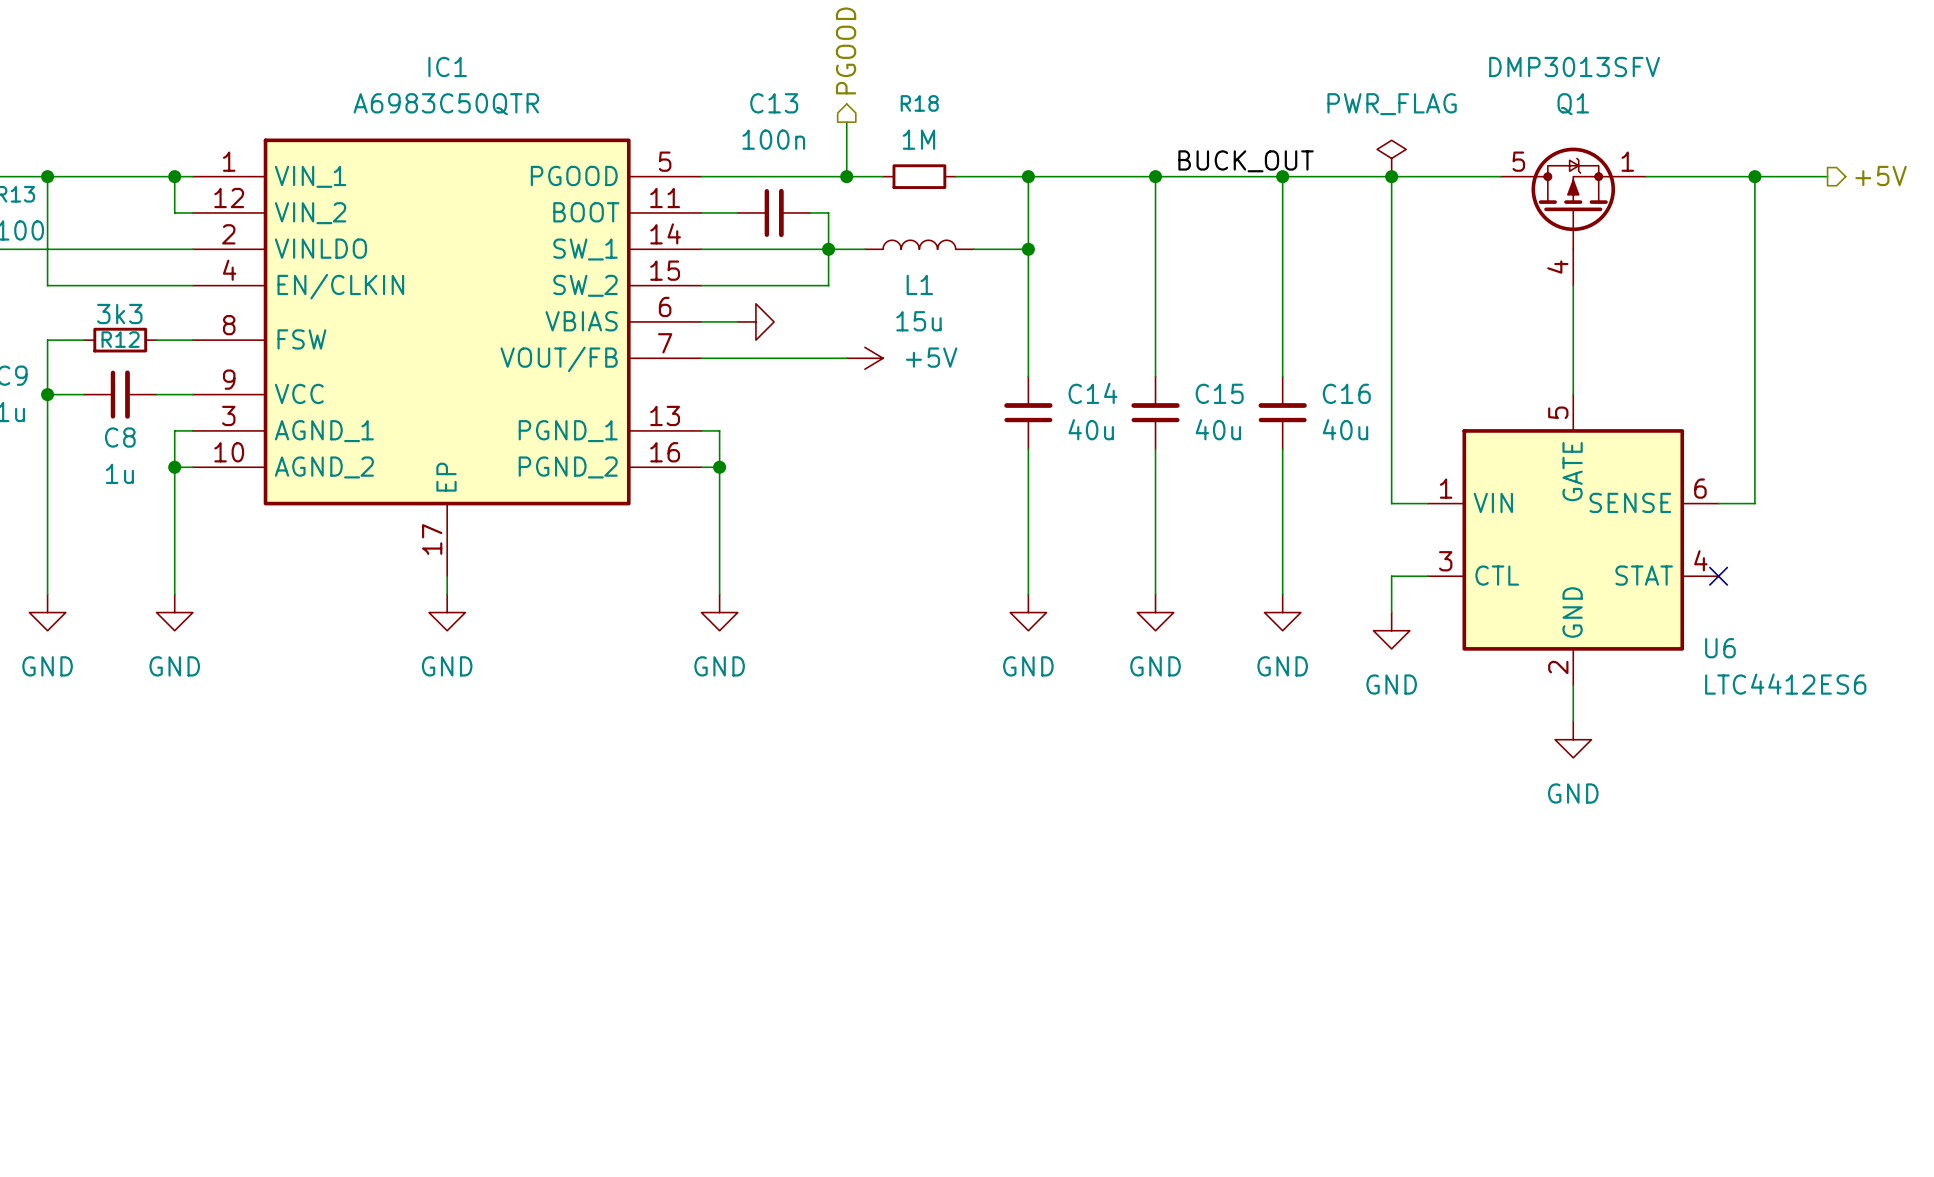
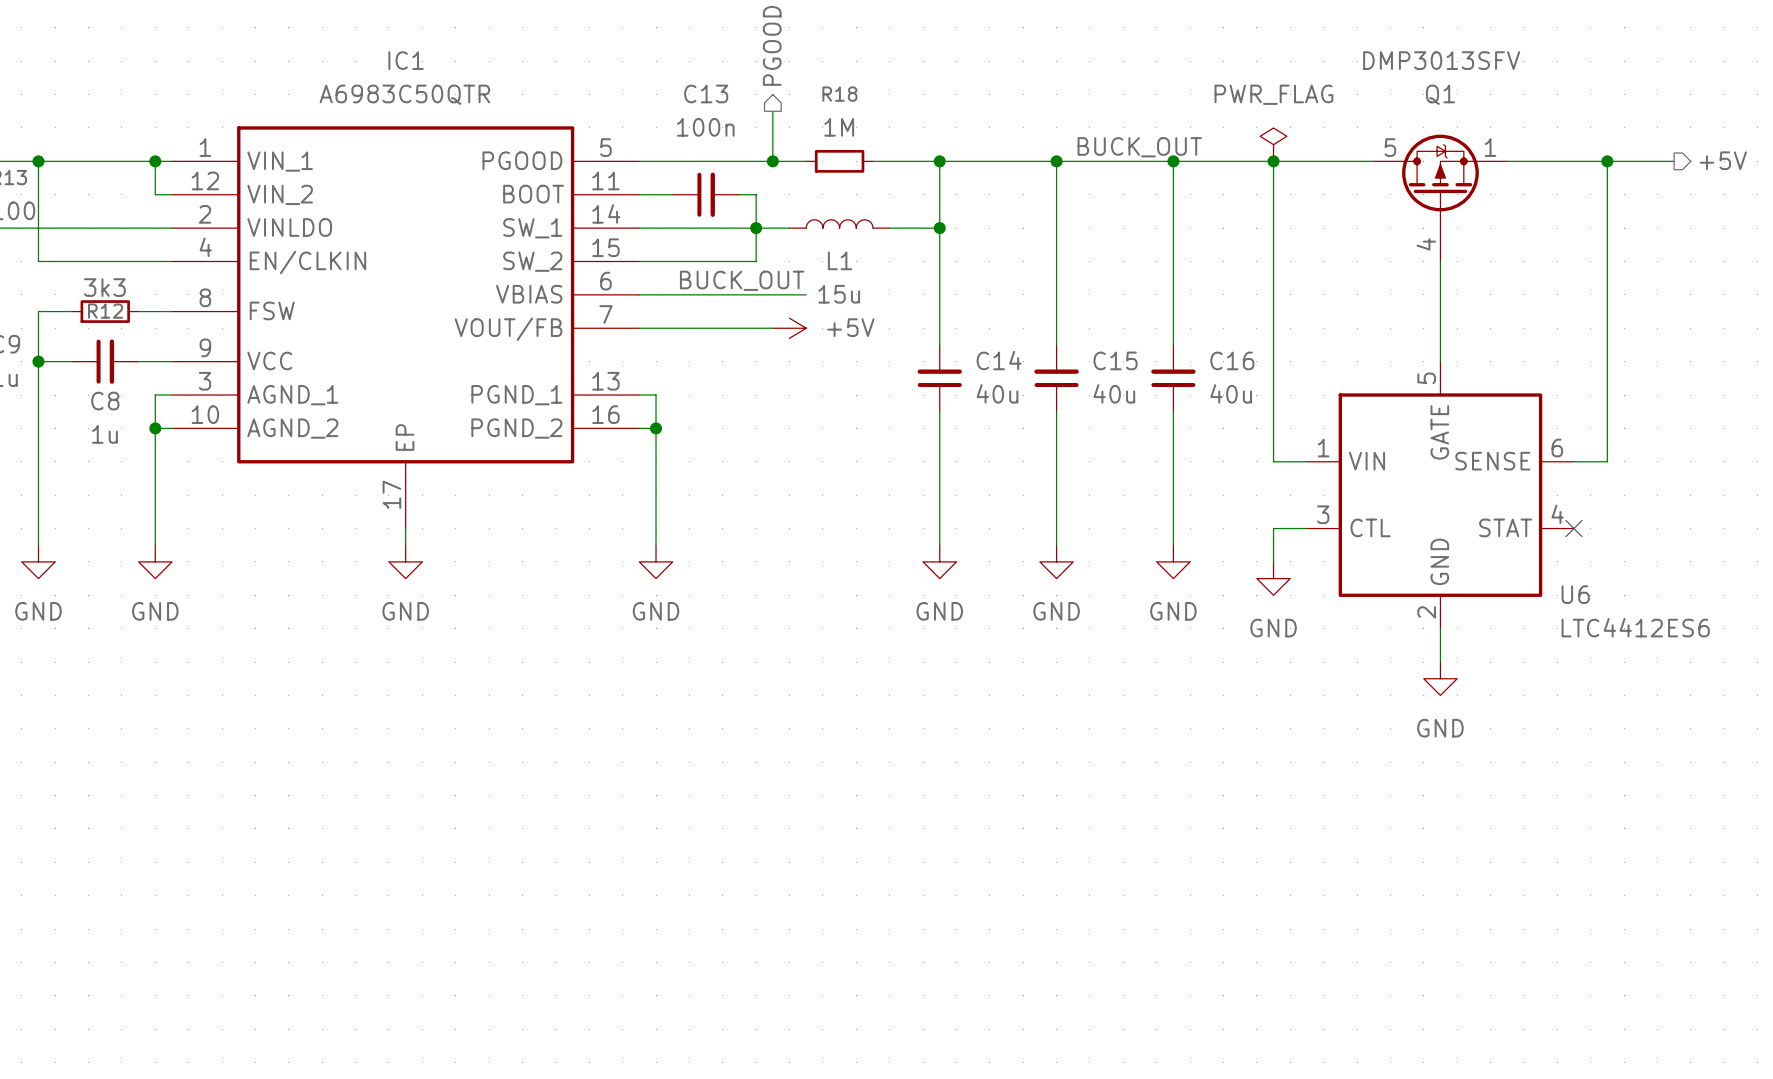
label: none -> BUCK_OUT (742, 280)
wire: none -> (672, 294) (806, 294)
power symbol: (755, 321) -> none

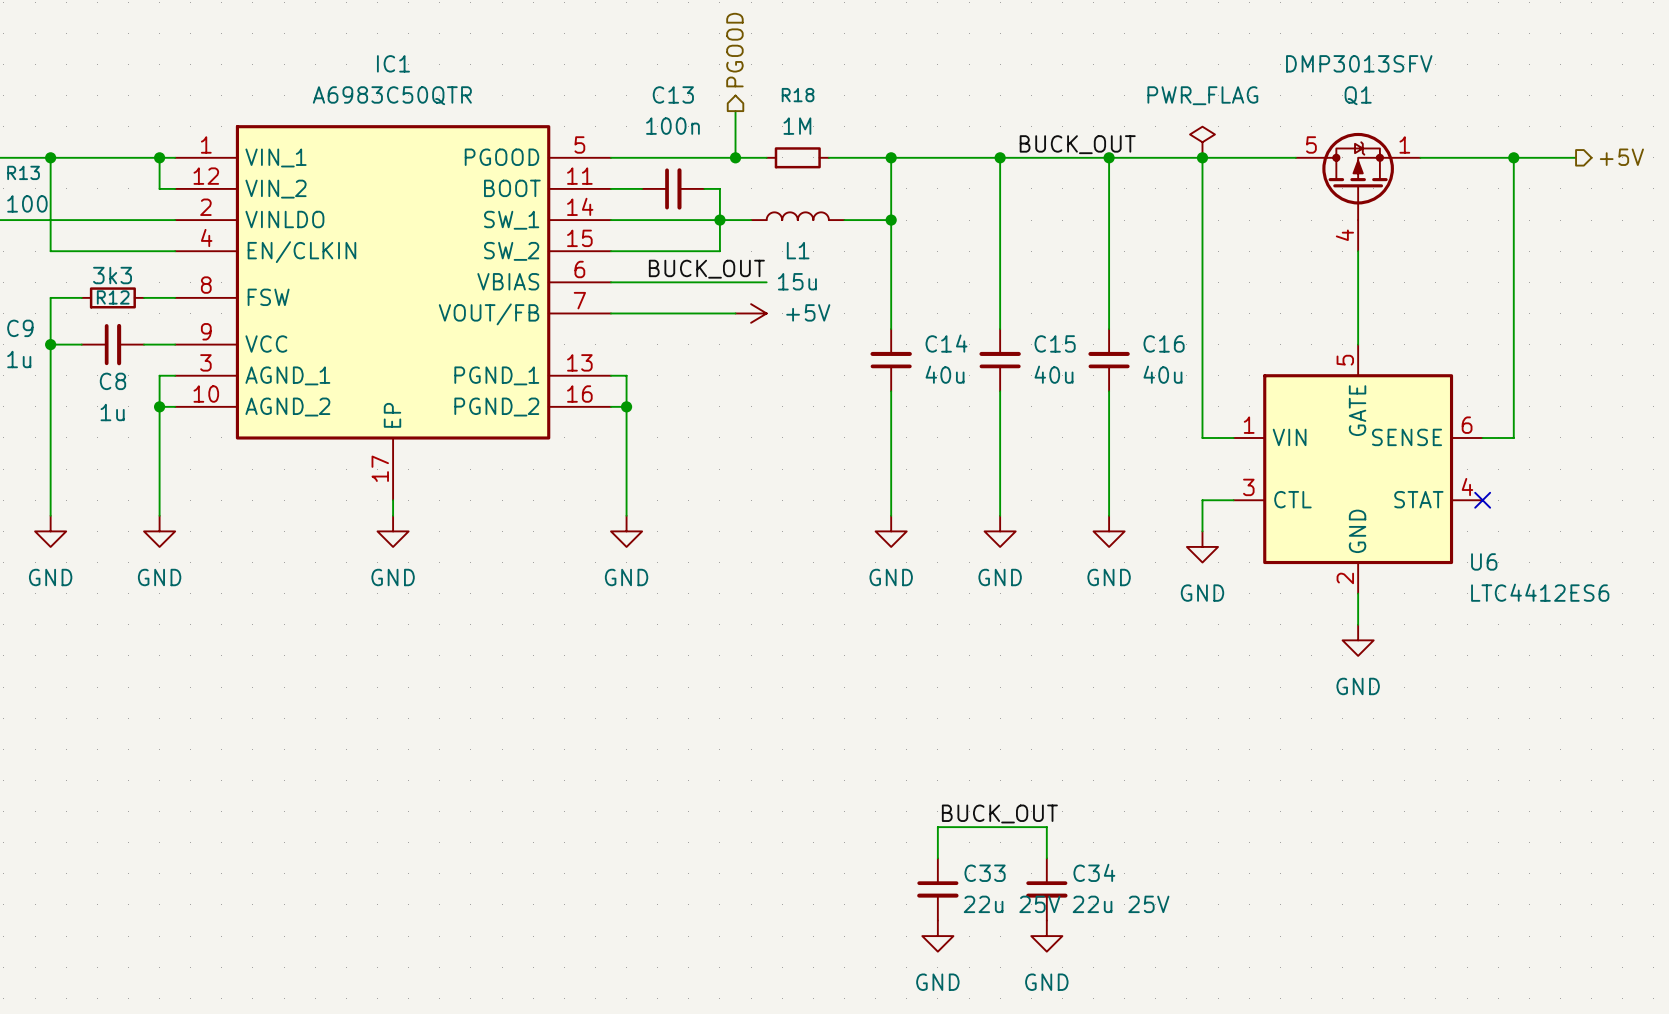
label: none -> BUCK_OUT (999, 813)
wire: none -> (937, 858) (937, 827) (1046, 827) (1046, 858)
C33: none -> 22u 25V (937, 889)
C34: none -> 22u 25V (1046, 889)
power symbol: none -> GND (937, 936)
power symbol: none -> GND (1046, 936)

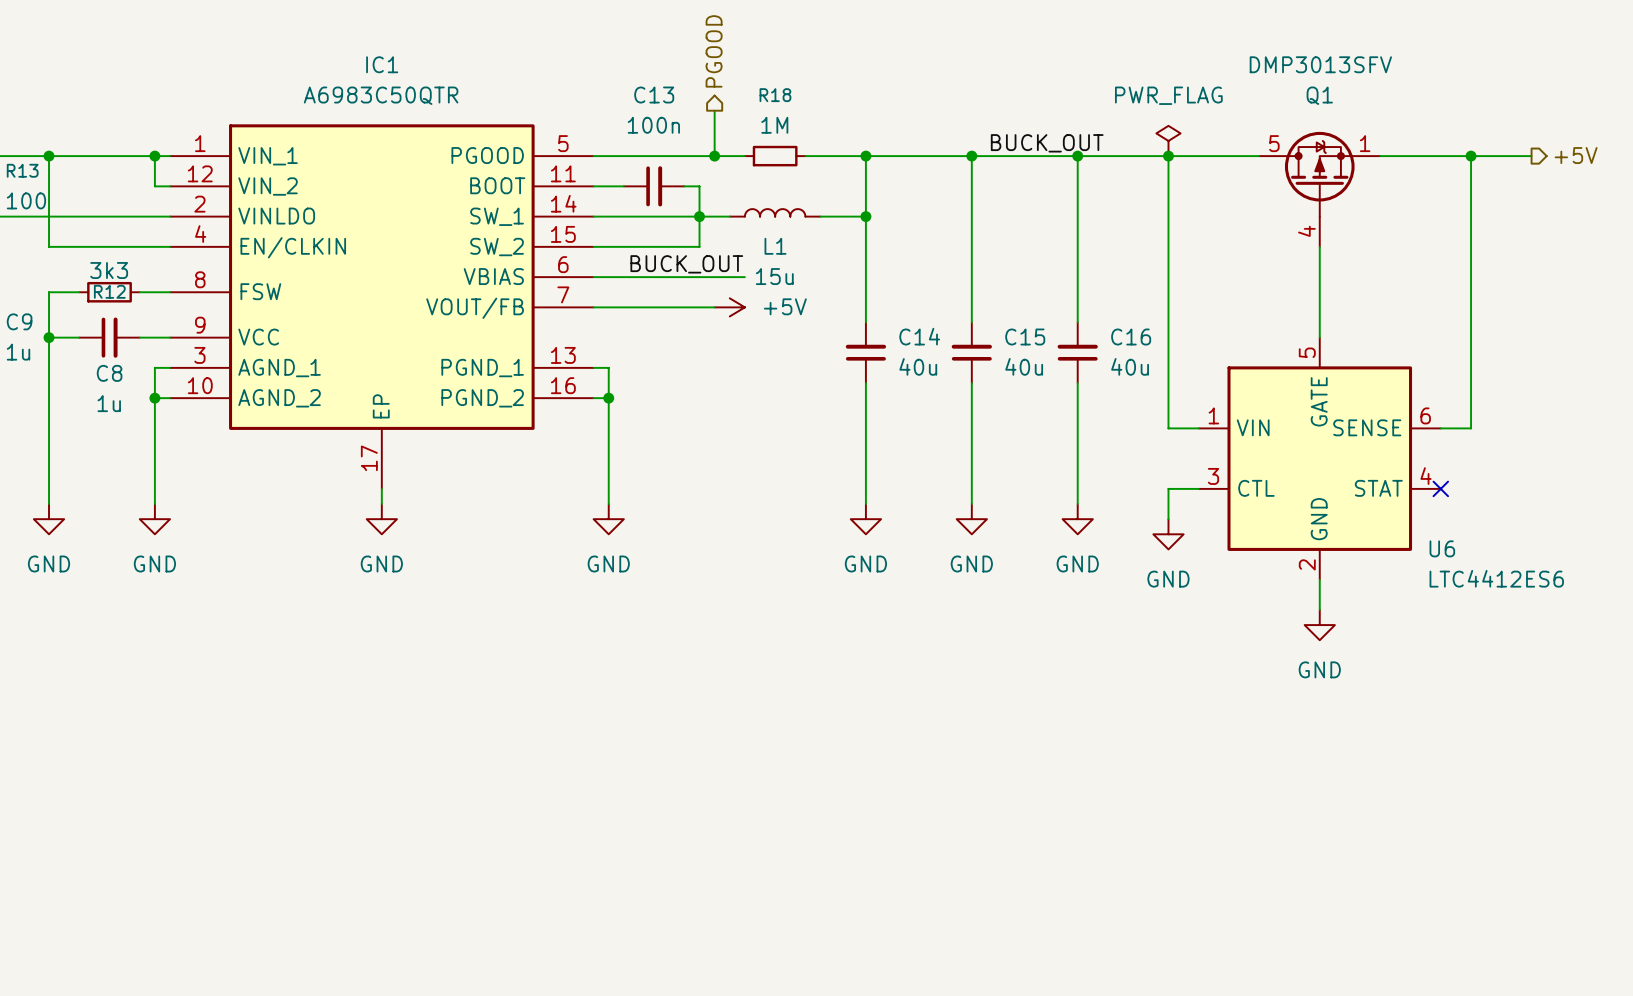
label: BUCK_OUT (999, 813) -> none
wire: (937, 858) (937, 827) (1046, 827) (1046, 858) -> none
C33: 22u 25V (937, 889) -> none
C34: 22u 25V (1046, 889) -> none
power symbol: GND (937, 936) -> none
power symbol: GND (1046, 936) -> none

